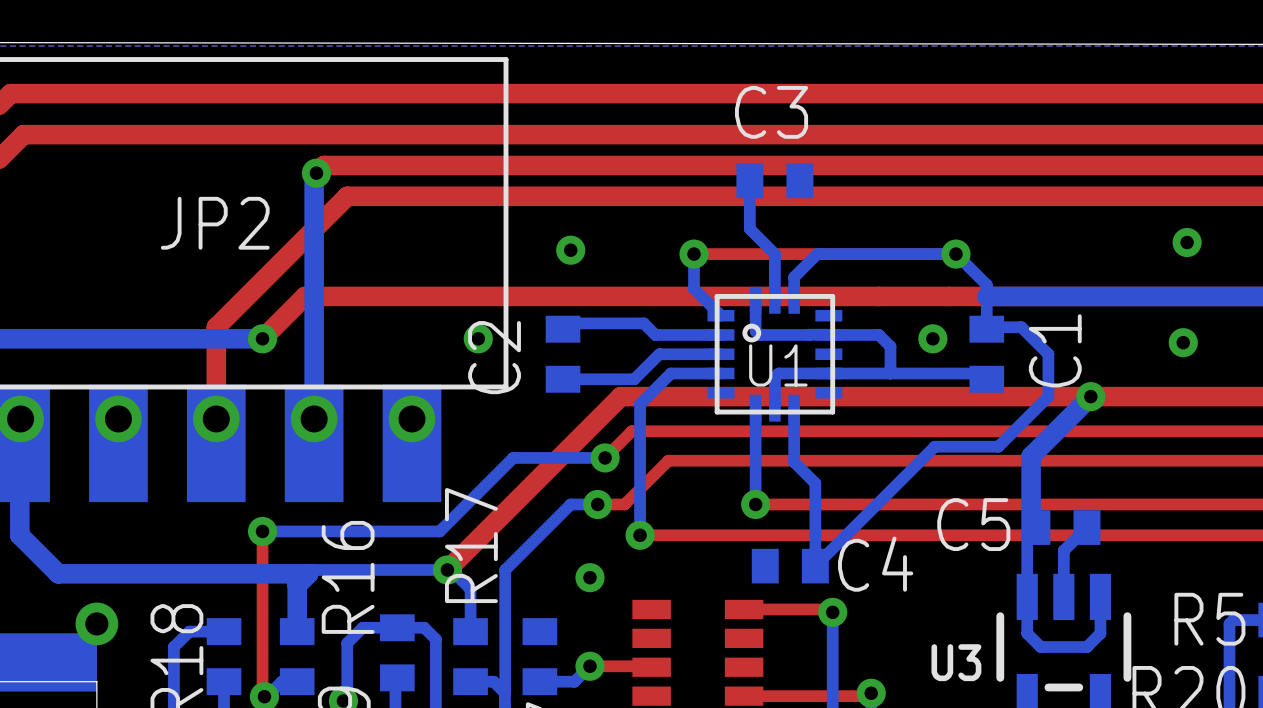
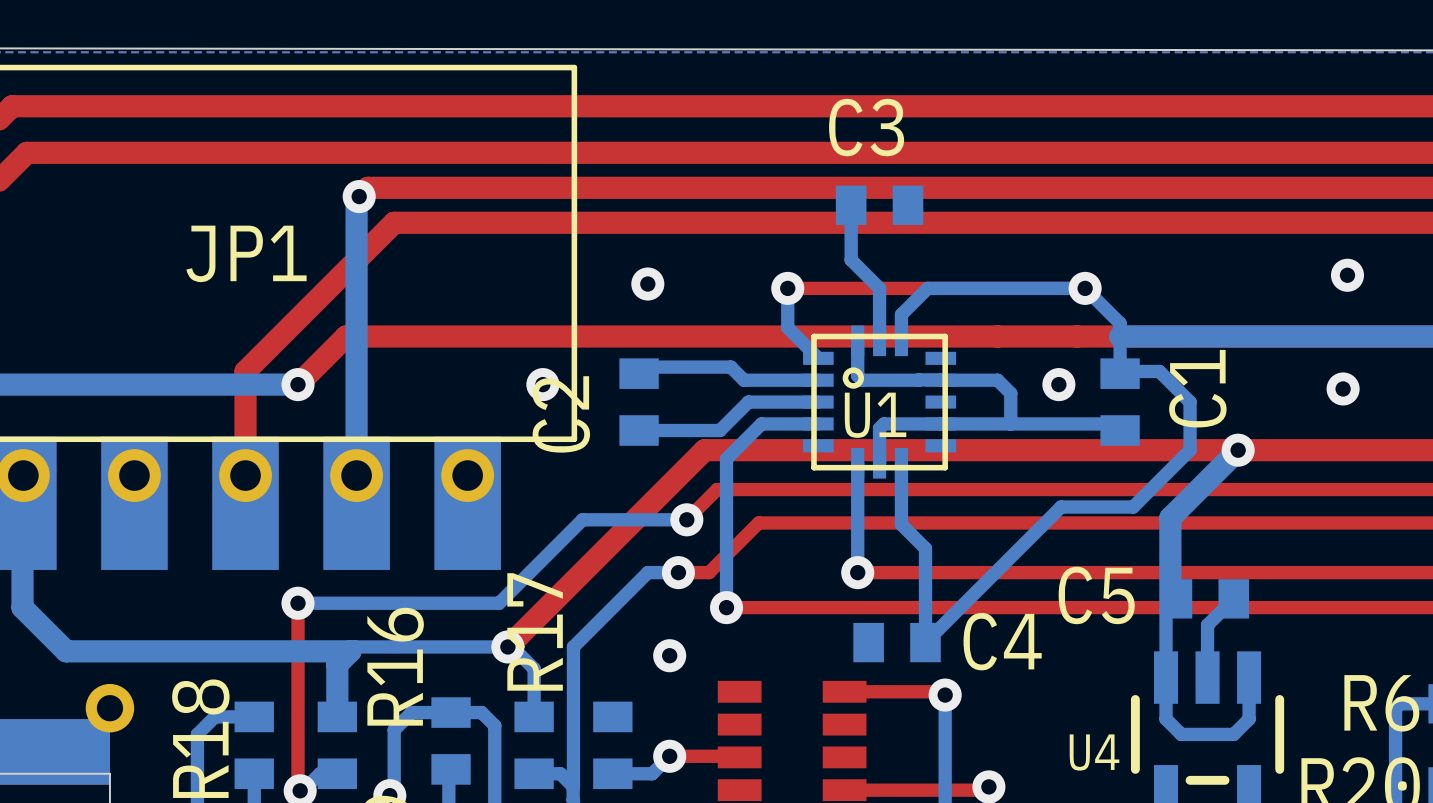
JP2 name: JP2 (215, 223) -> JP1 (246, 253)
R5 name: R5 (1209, 619) -> R6 (1381, 703)
U3 name: U3 (956, 662) -> U4 (1094, 752)

